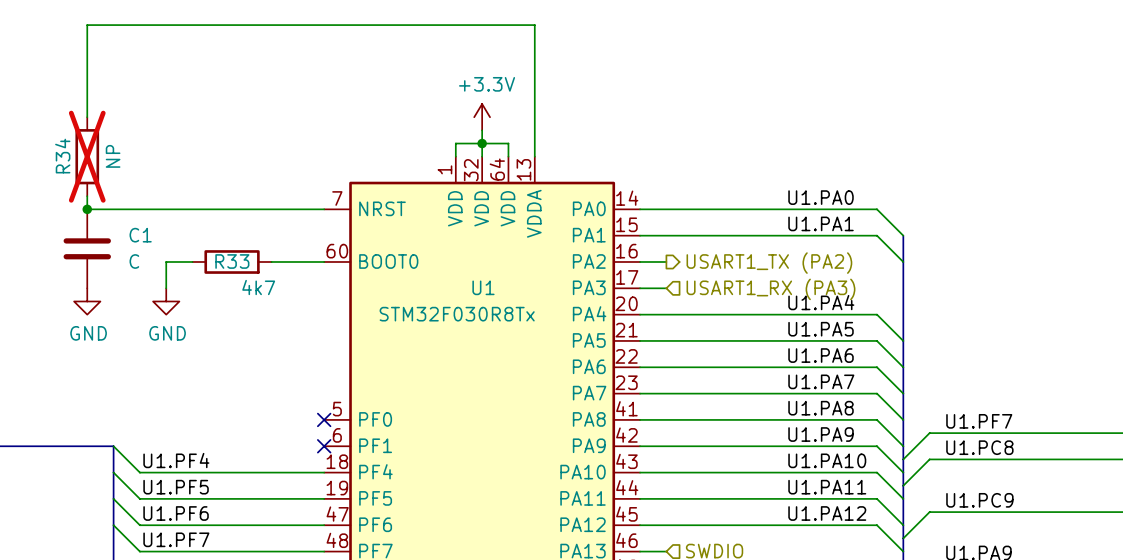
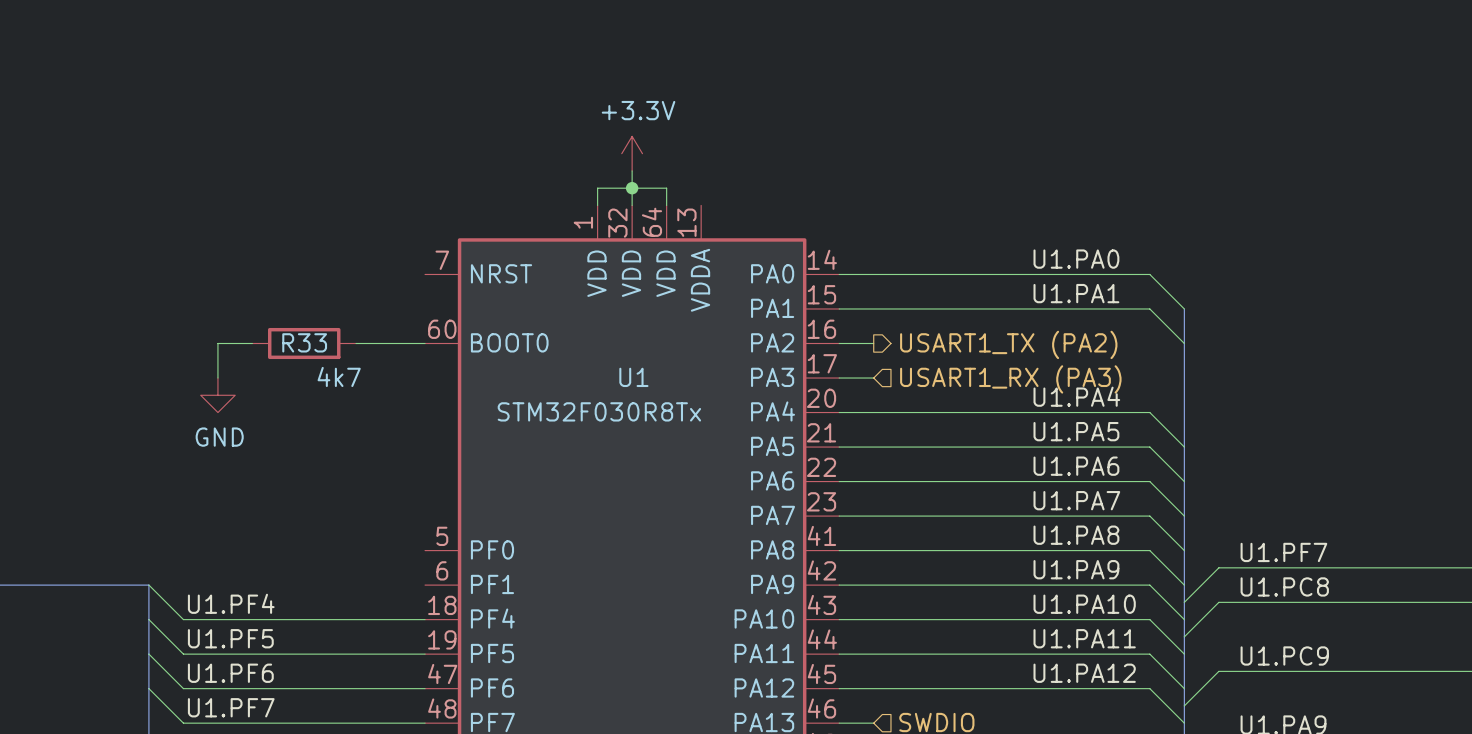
wire: (87, 117) (87, 25) (534, 25) (534, 156) -> none
R34: NP (87, 156) -> none
wire: (87, 196) (87, 209) (324, 209) -> none
junction: (87, 209) -> none
C1: C (87, 248) -> none
power symbol: GND (87, 301) -> none
no-connect mark: (324, 419) -> none
no-connect mark: (324, 446) -> none

